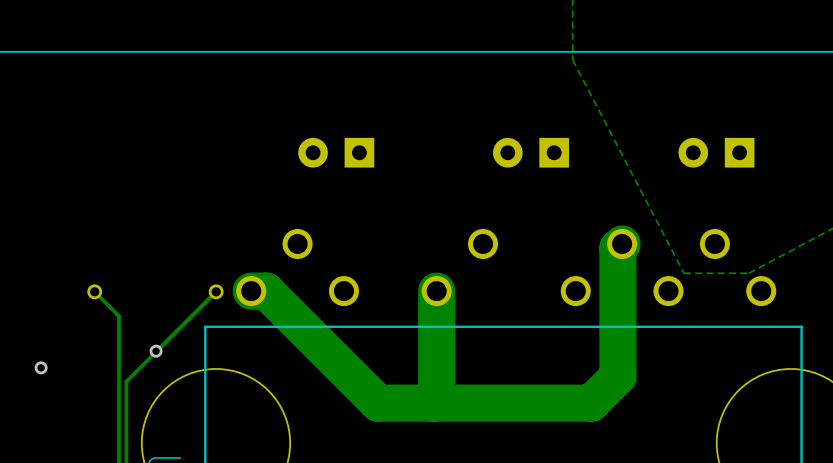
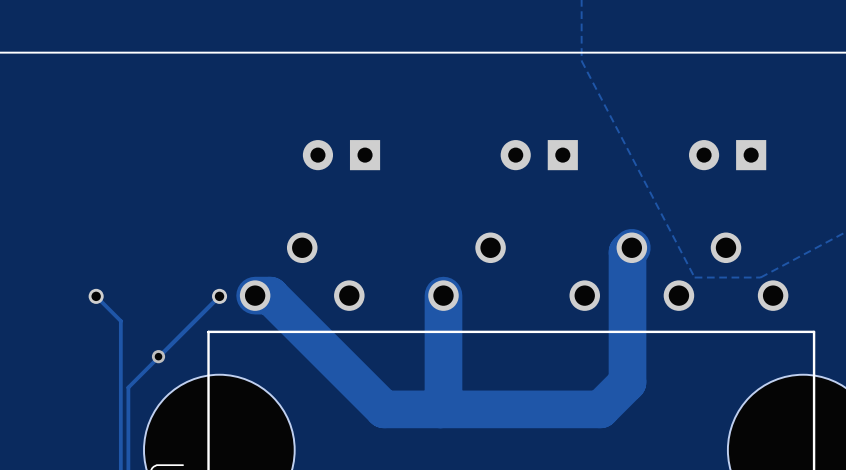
via: (41, 367) -> none

